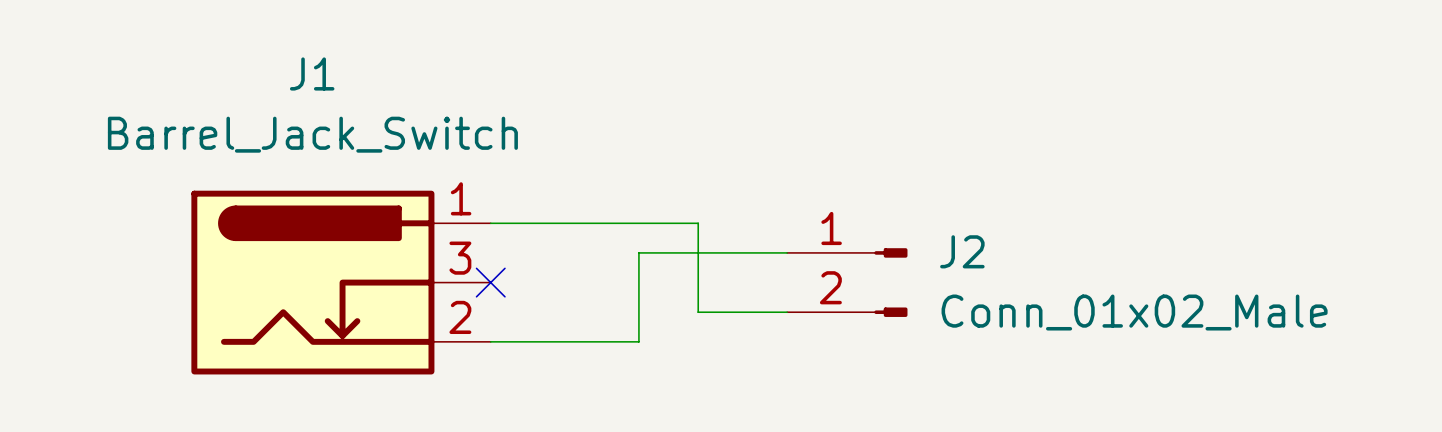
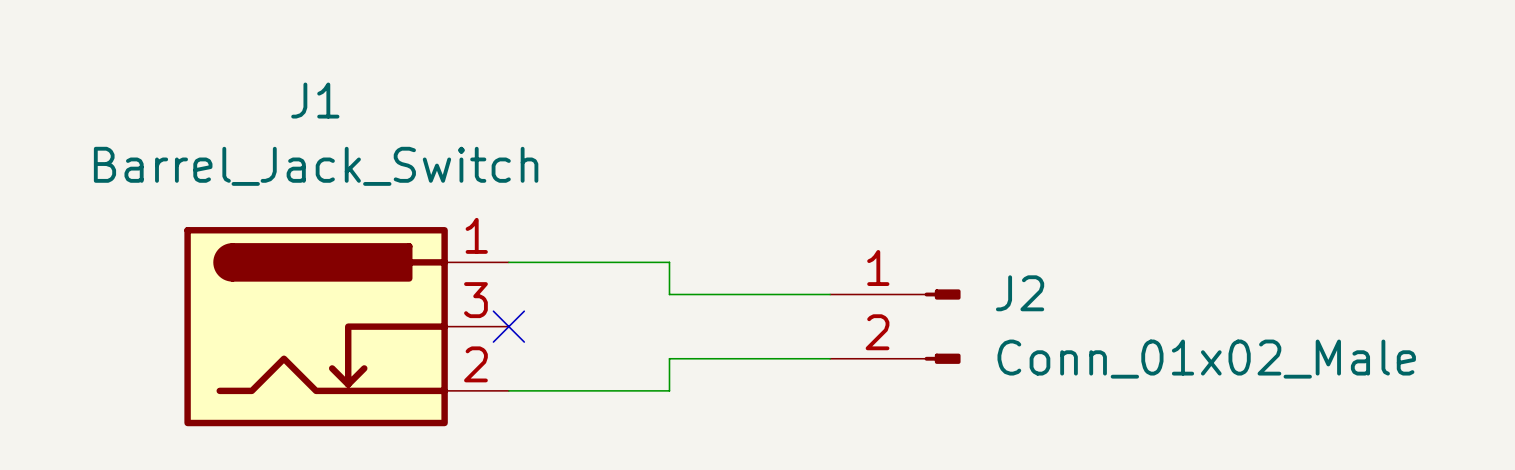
wire: (638, 223) (698, 223) (698, 312) -> (669, 262) (669, 294)
wire: (638, 252) (638, 312) -> (733, 358) (669, 358)

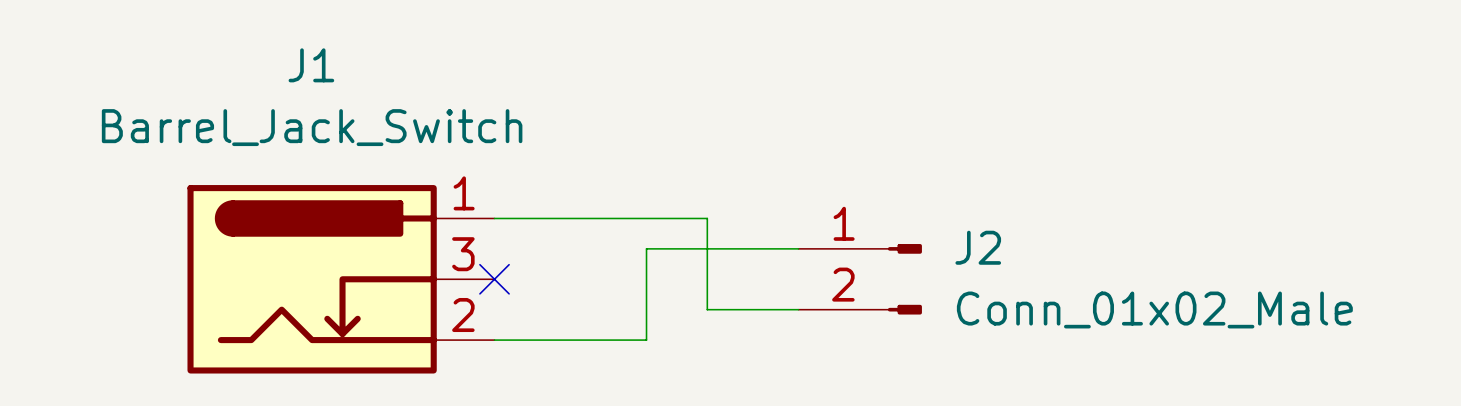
wire: (669, 262) (669, 294) -> (646, 218) (707, 218) (707, 309)
wire: (669, 358) (733, 358) -> (646, 309) (646, 248)

